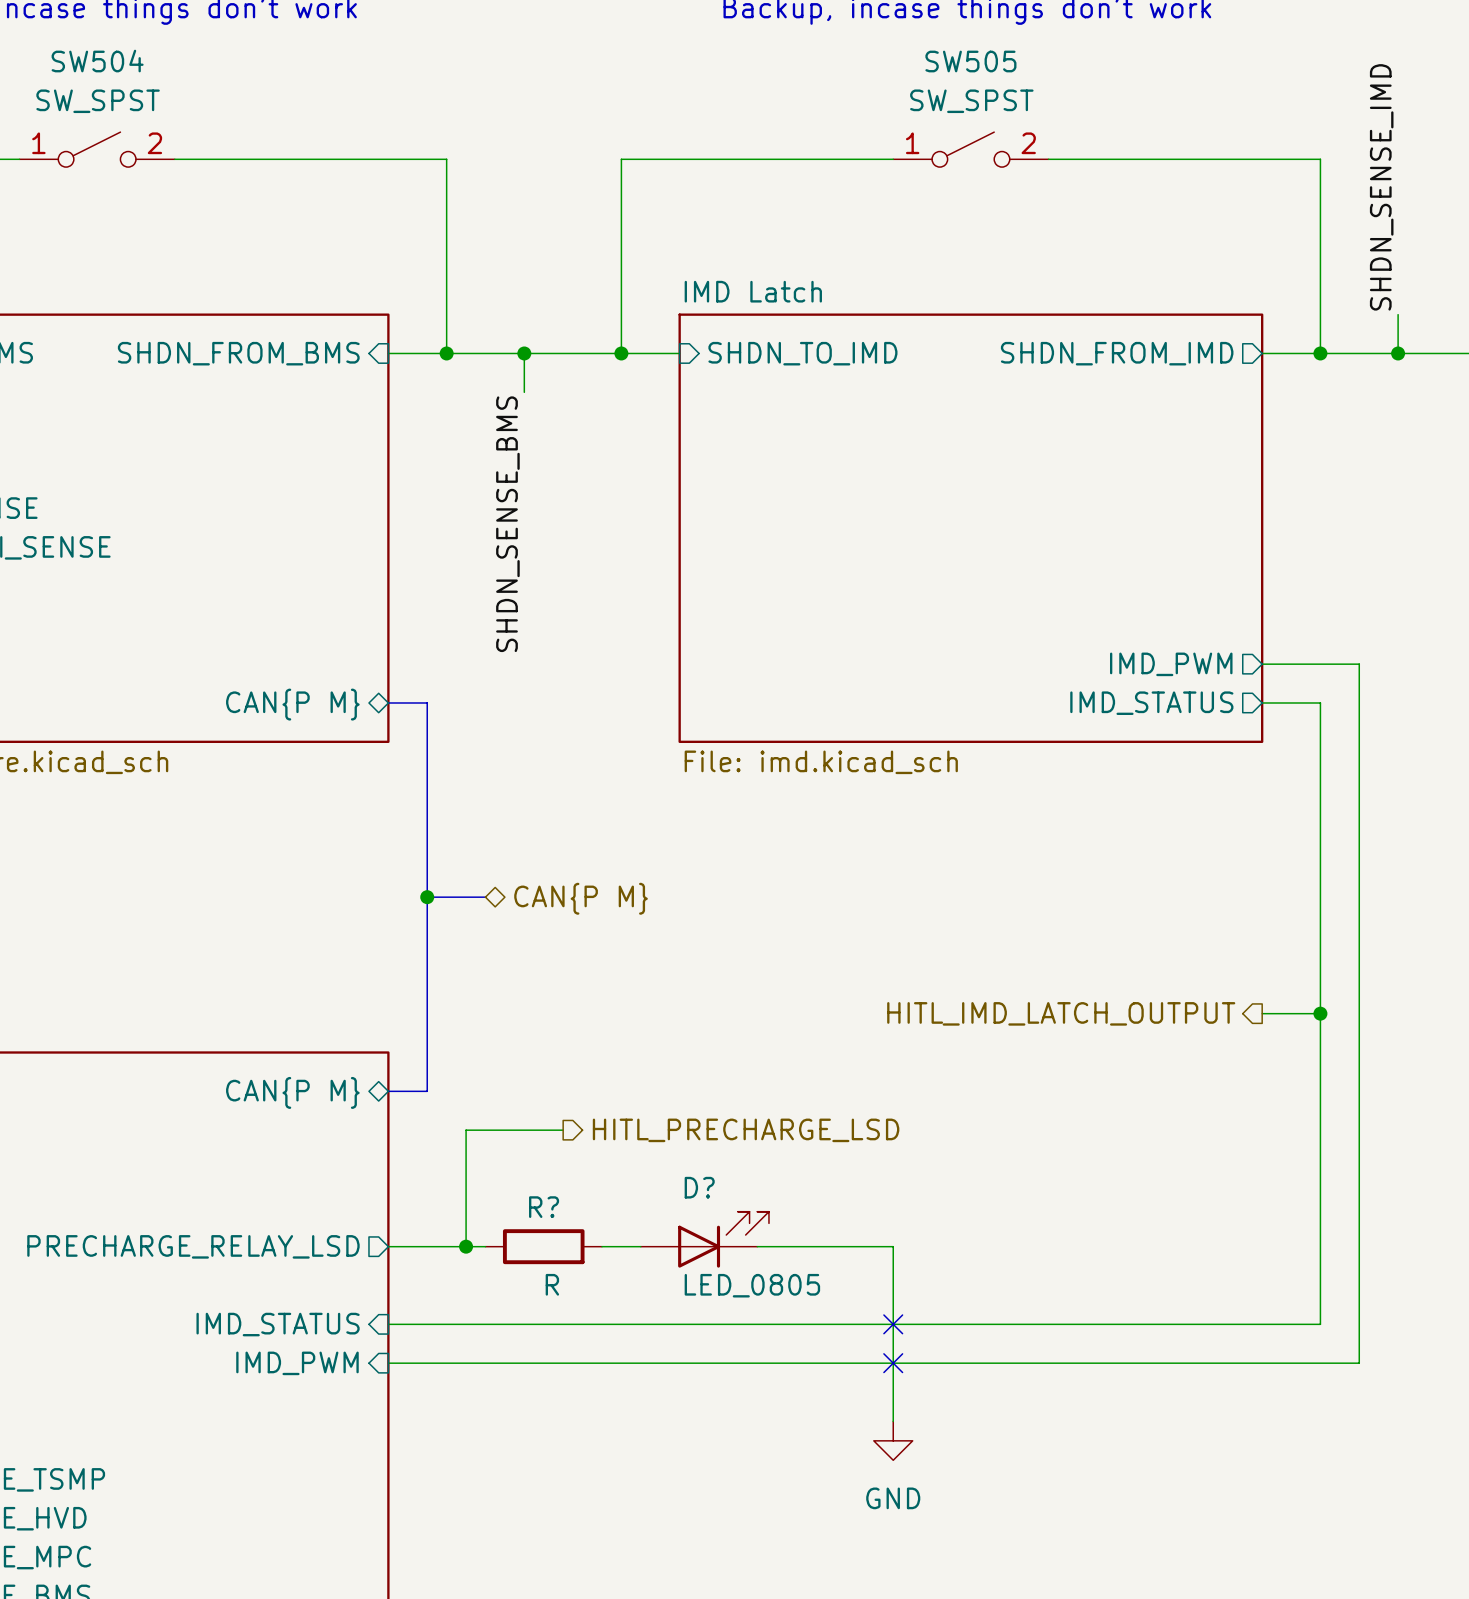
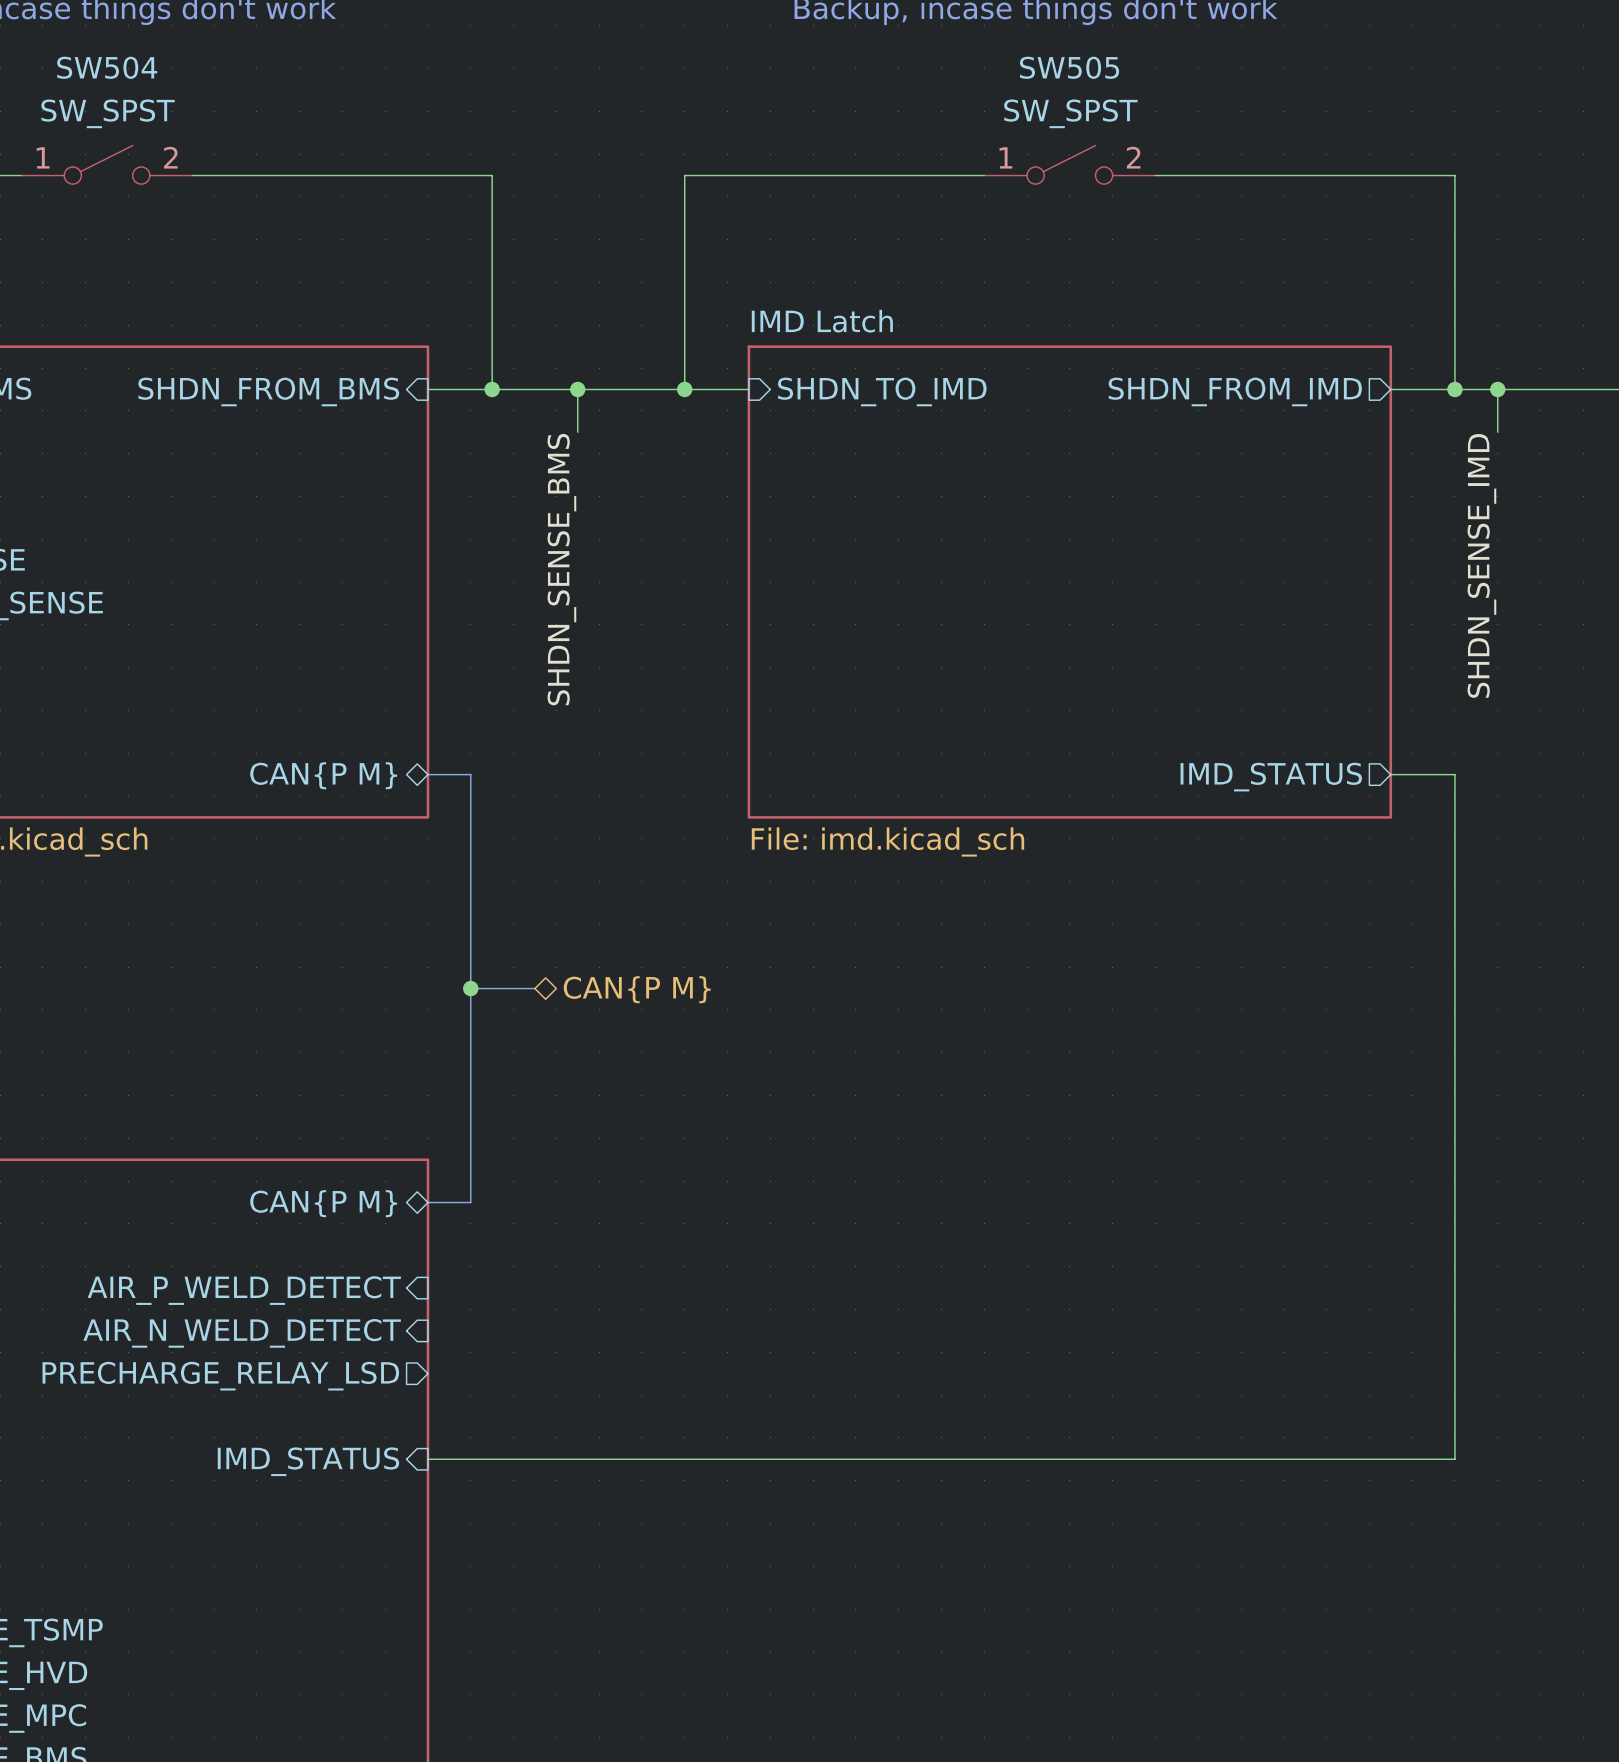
label position: SHDN_SENSE_IMD (1381, 187) -> SHDN_SENSE_IMD (1481, 565)
wire: (1398, 314) (1398, 353) -> (1497, 389) (1497, 432)
junction position: (1398, 353) -> (1497, 389)
sheet pin: IMD_PWM (1171, 664) -> none
wire: (1262, 664) (1359, 664) (1359, 1363) (388, 1363) -> none
hierarchical label: HITL_IMD_LATCH_OUTPUT (1061, 1013) -> none
wire: (1262, 1013) (1320, 1013) -> none
junction: (1320, 1013) -> none
wire: (563, 1130) (466, 1130) (466, 1246) -> none
hierarchical label: HITL_PRECHARGE_LSD (746, 1130) -> none
sheet pin: none -> AIR_P_WELD_DETECT (244, 1290)
sheet pin: none -> AIR_N_WELD_DETECT (242, 1333)
D?: LED_0805 (704, 1239) -> none
wire: (388, 1246) (485, 1246) -> none
junction: (466, 1246) -> none
R?: R (543, 1246) -> none
wire: (601, 1246) (640, 1246) -> none
wire: (757, 1246) (893, 1246) (893, 1421) -> none
no-connect mark: (893, 1324) -> none
sheet pin: IMD_PWM (297, 1363) -> none
no-connect mark: (893, 1363) -> none
power symbol: GND (893, 1440) -> none

